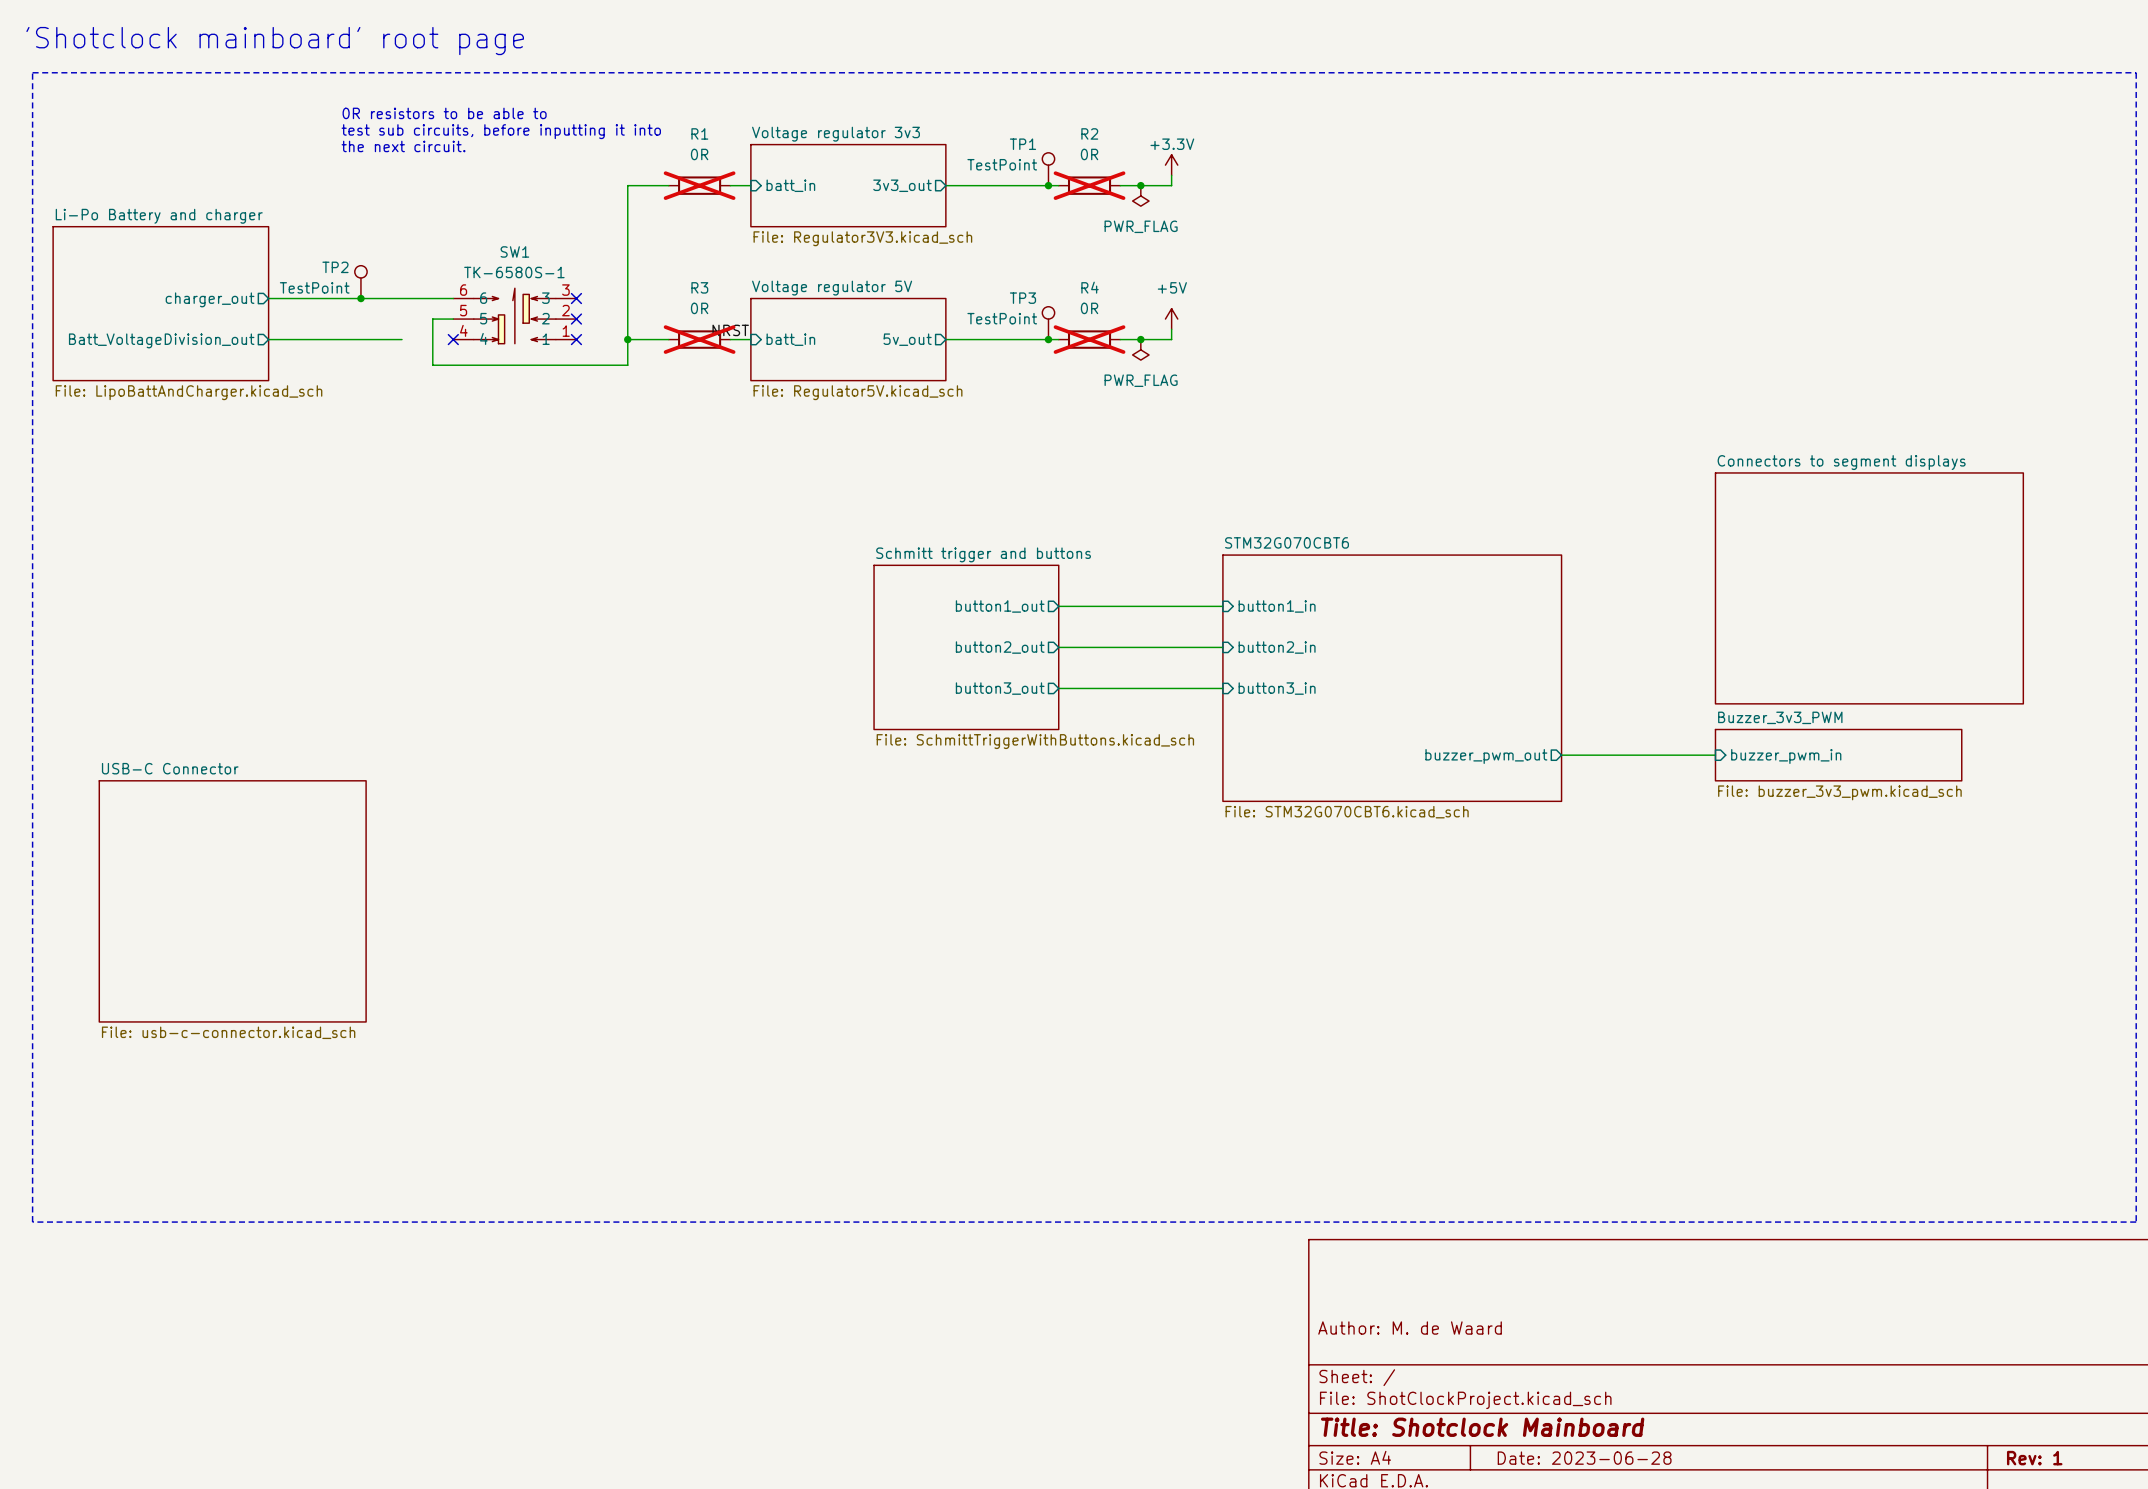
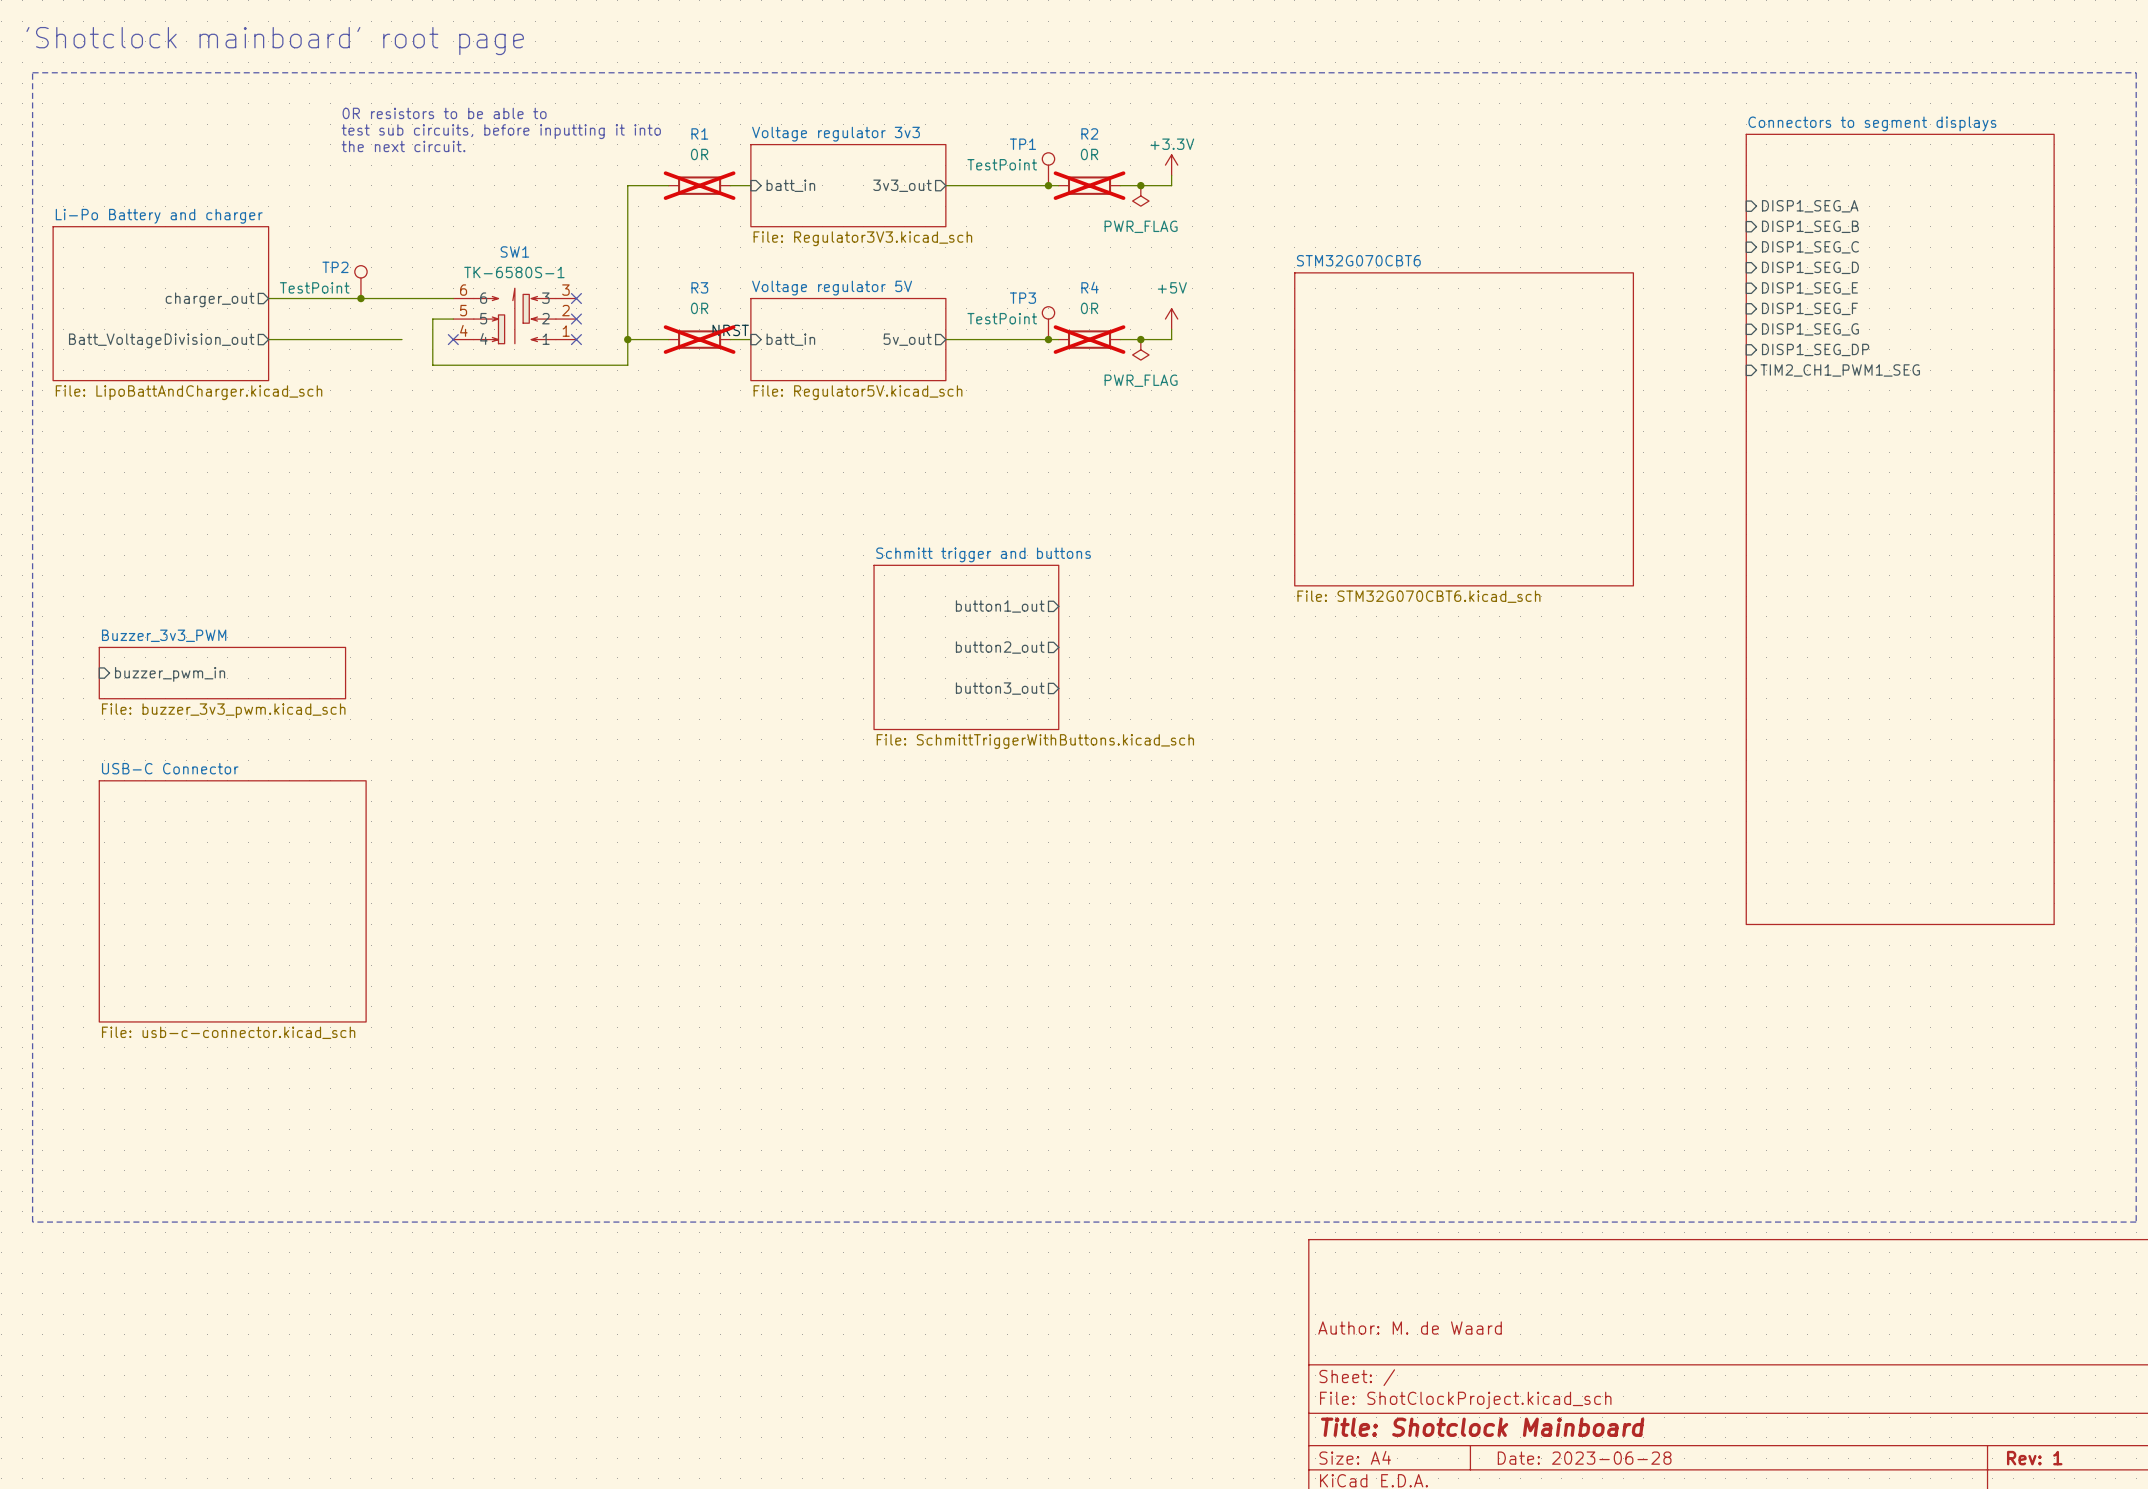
sheet pin: none -> DISP1_SEG_A (1810, 206)
sheet pin: none -> DISP1_SEG_B (1810, 226)
sheet pin: none -> DISP1_SEG_C (1810, 247)
sheet pin: none -> DISP1_SEG_D (1810, 267)
sheet pin: none -> DISP1_SEG_E (1809, 288)
sheet pin: none -> DISP1_SEG_F (1809, 308)
sheet pin: none -> DISP1_SEG_G (1810, 329)
sheet pin: none -> DISP1_SEG_DP (1815, 349)
sheet pin: none -> TIM2_CH1_PWM1_SEG (1840, 370)
sheet Connectors to segment displays: none -> (1900, 529)
sheet STM32G070CBT6 name position: STM32G070CBT6 (1287, 542) -> STM32G070CBT6 (1358, 260)
sheet STM32G070CBT6 shape: [1222, 554, 1563, 802] -> [1294, 272, 1635, 587]
sheet Connectors to segment displays: (1869, 588) -> none
wire: (1058, 606) (1222, 606) -> none
sheet pin: button1_in (1277, 606) -> none
wire: (1058, 647) (1222, 647) -> none
sheet pin: button2_in (1277, 647) -> none
sheet pin: none -> buzzer_pwm_in (170, 674)
wire: (1058, 688) (1222, 688) -> none
sheet pin: button3_in (1277, 688) -> none
wire: (1561, 755) (1715, 755) -> none
sheet Buzzer_3v3_PWM position: (1838, 755) -> (222, 673)
sheet pin: buzzer_pwm_out (1486, 756) -> none
sheet pin: buzzer_pwm_in (1786, 756) -> none
sheet STM32G070CBT6 value position: File: STM32G070CBT6.kicad_sch (1347, 812) -> File: STM32G070CBT6.kicad_sch (1418, 596)

